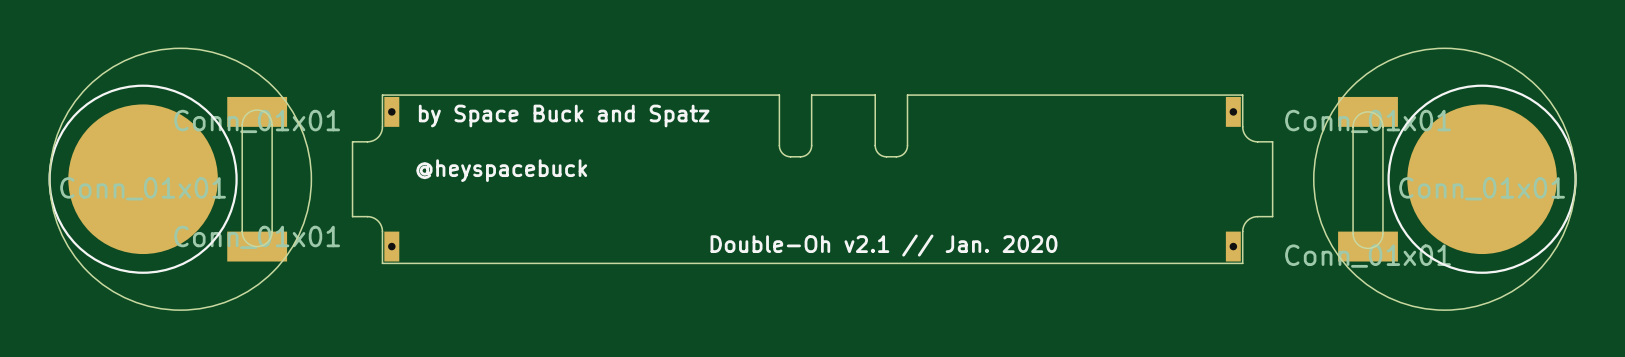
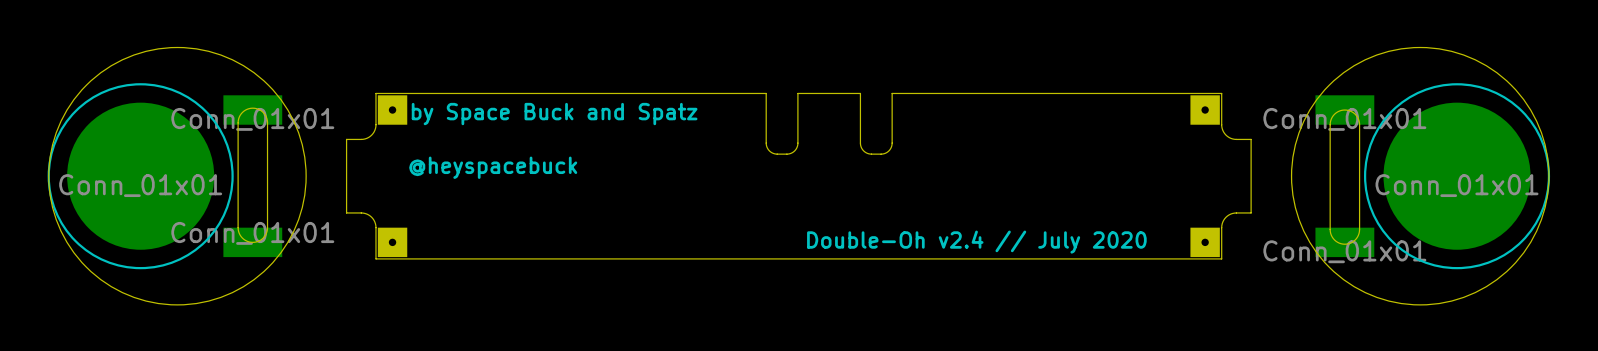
part footprint: [384, 96, 400, 127] -> [377, 95, 408, 125]
part footprint: [1225, 96, 1241, 127] -> [1190, 95, 1220, 125]
part footprint: [384, 231, 400, 262] -> [377, 227, 408, 258]
part footprint: [1225, 231, 1241, 262] -> [1190, 227, 1220, 258]
text: Double-Oh v2.1 // Jan. 2020 (884, 245) -> Double-Oh v2.4 // July 2020 (976, 242)

